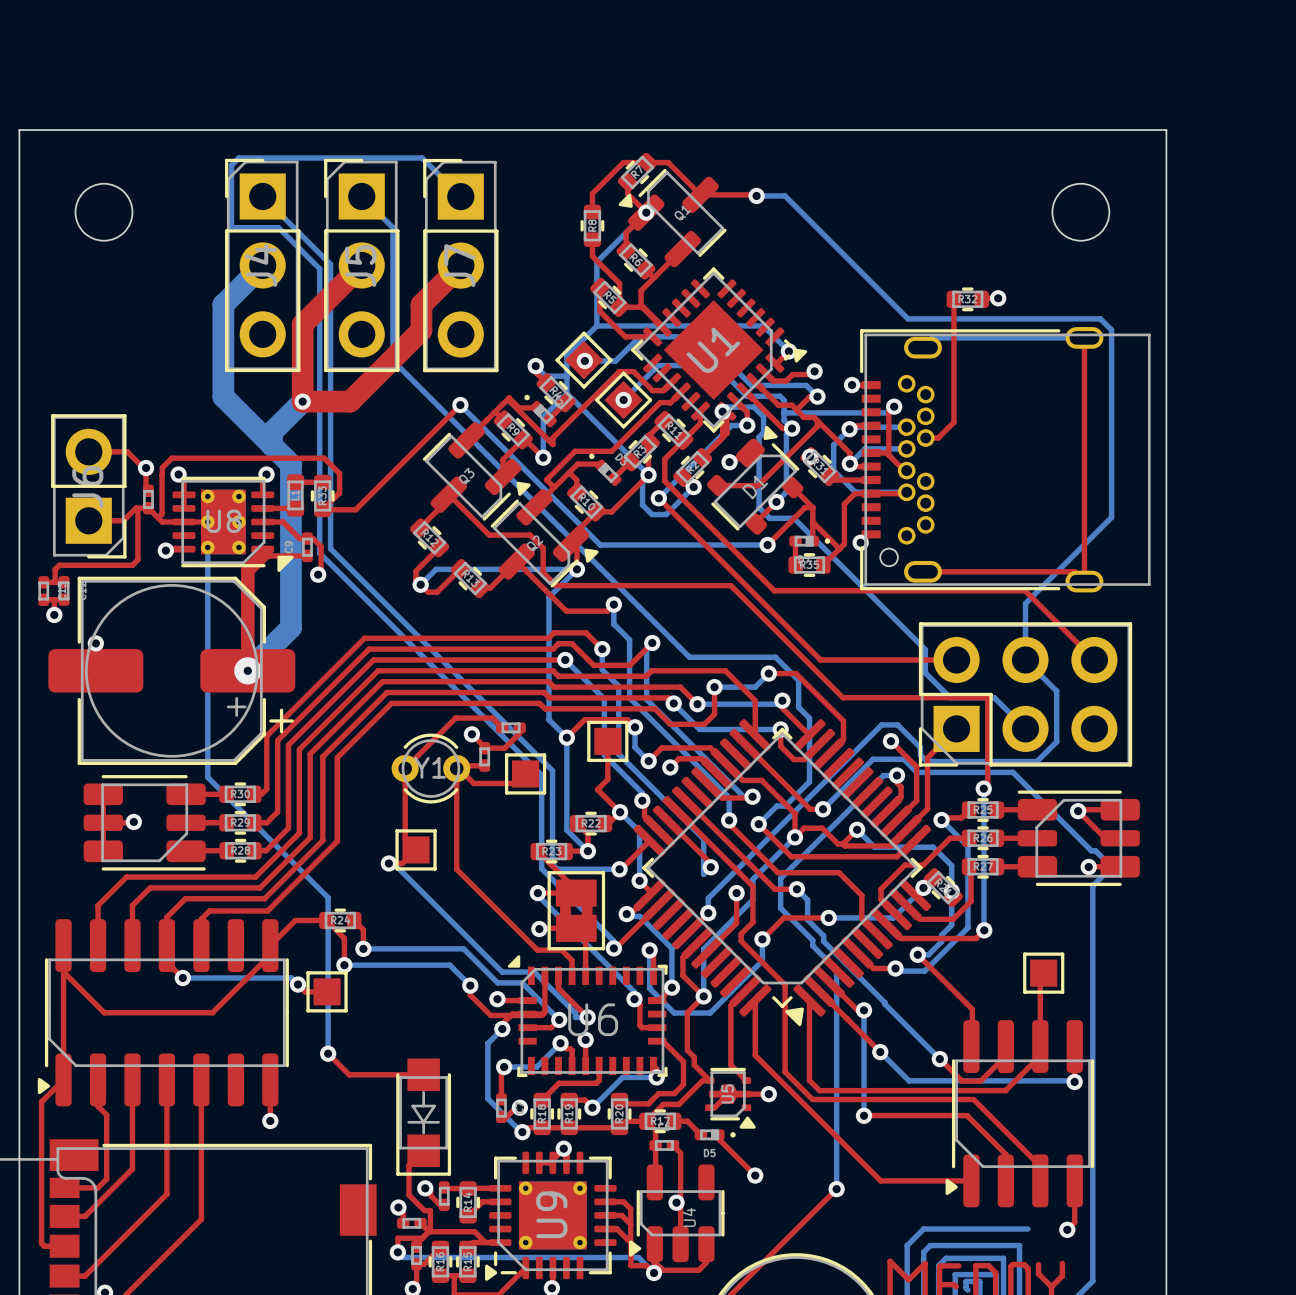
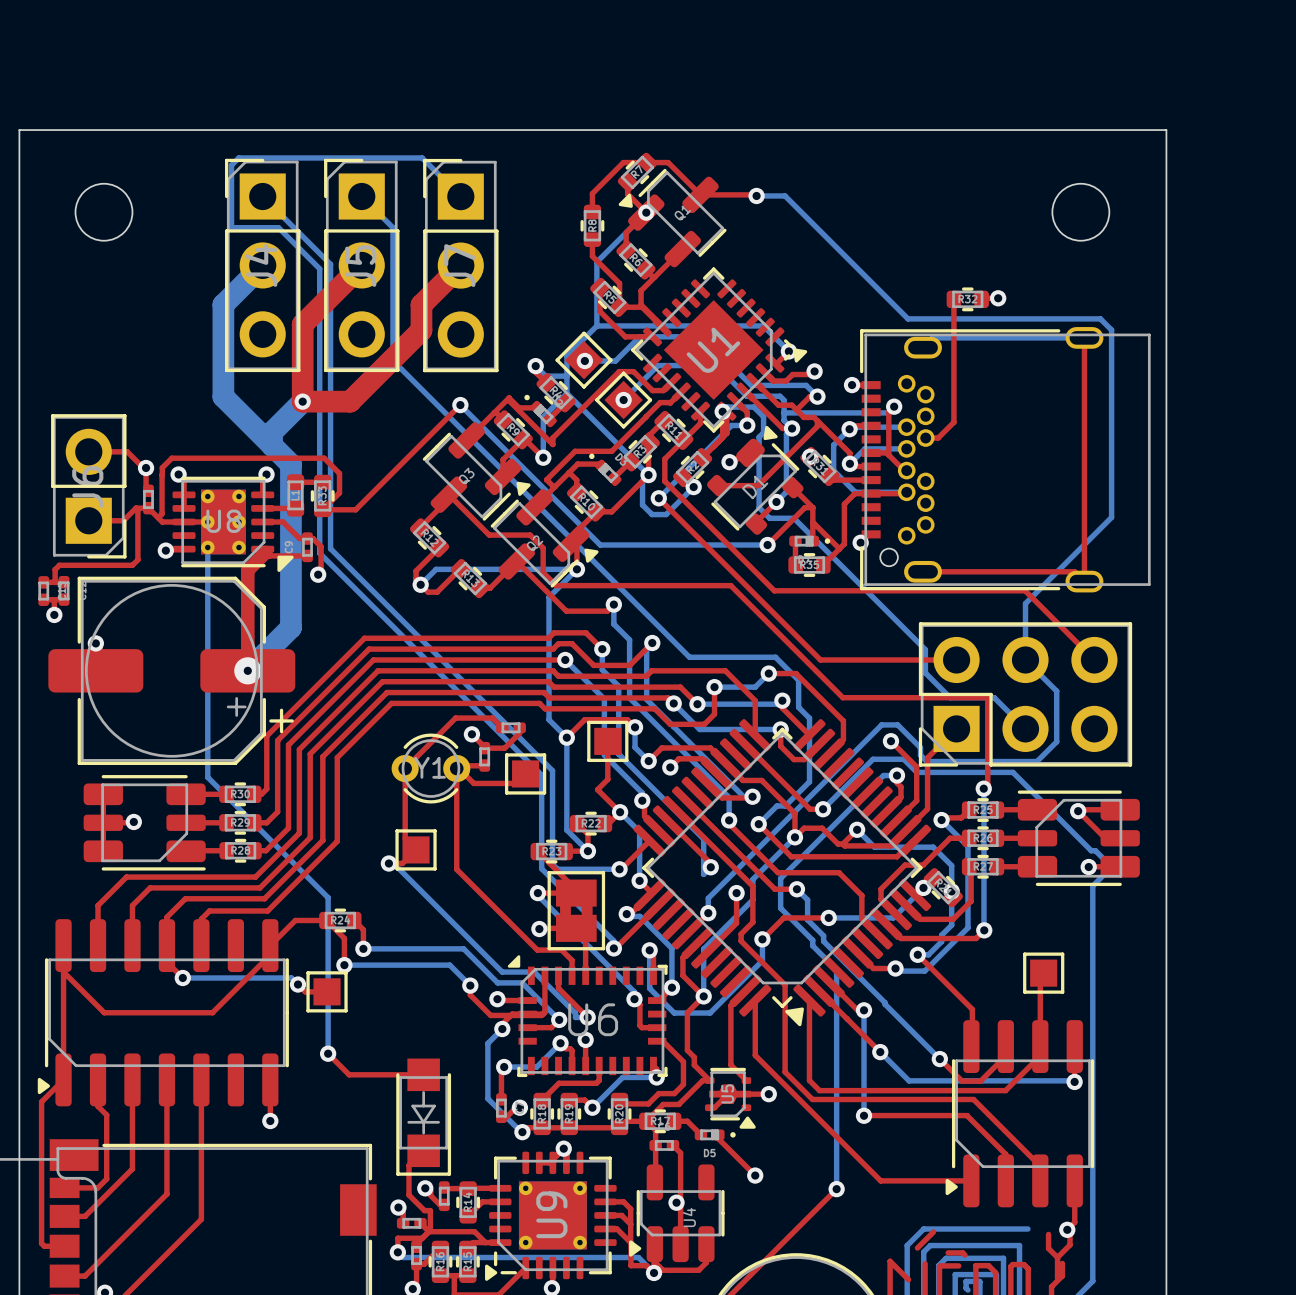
top track: none -> (1048, 1234) (1048, 1248) (1057, 1257)
top track: none -> (1070, 1235) (1070, 1245) (1057, 1257)
top track: none -> (1057, 1257) (1058, 1278)
top track: (924, 1263) (908, 1279) -> (933, 1232) (917, 1248)
top track: (1038, 1264) (1038, 1273) (1051, 1286) -> none
top track: (939, 1284) (954, 1284) (956, 1286) -> (948, 1252) (962, 1252) (964, 1255)

